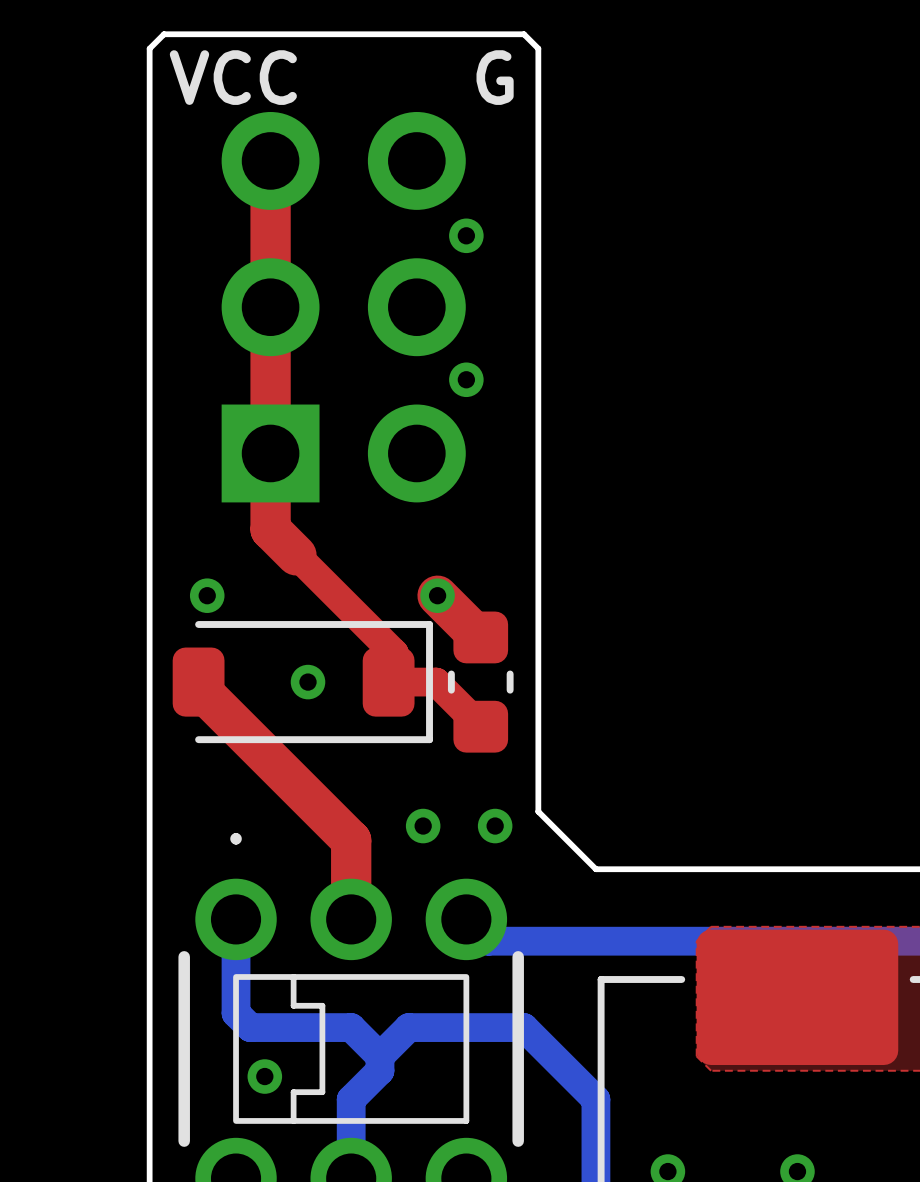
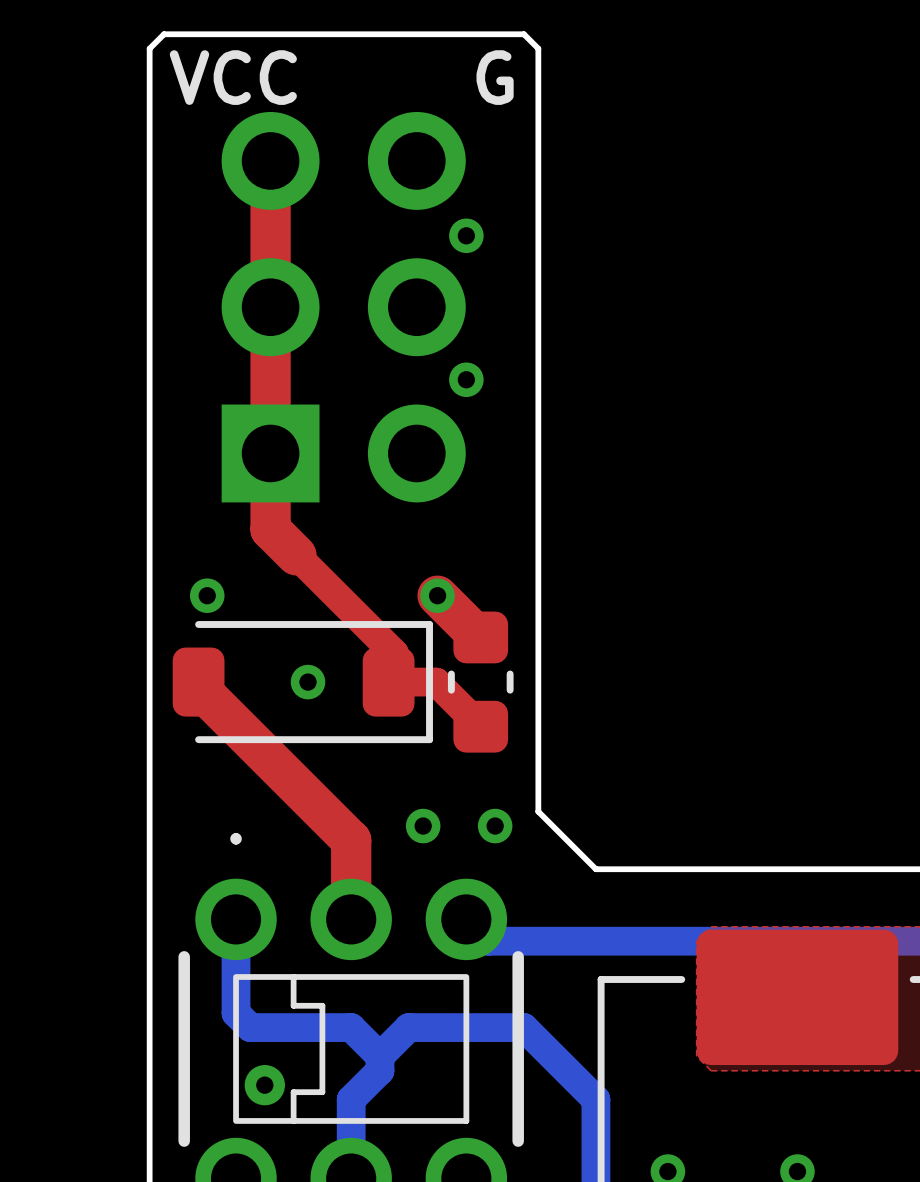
via size: [247, 1059, 283, 1094] -> [244, 1065, 285, 1106]

